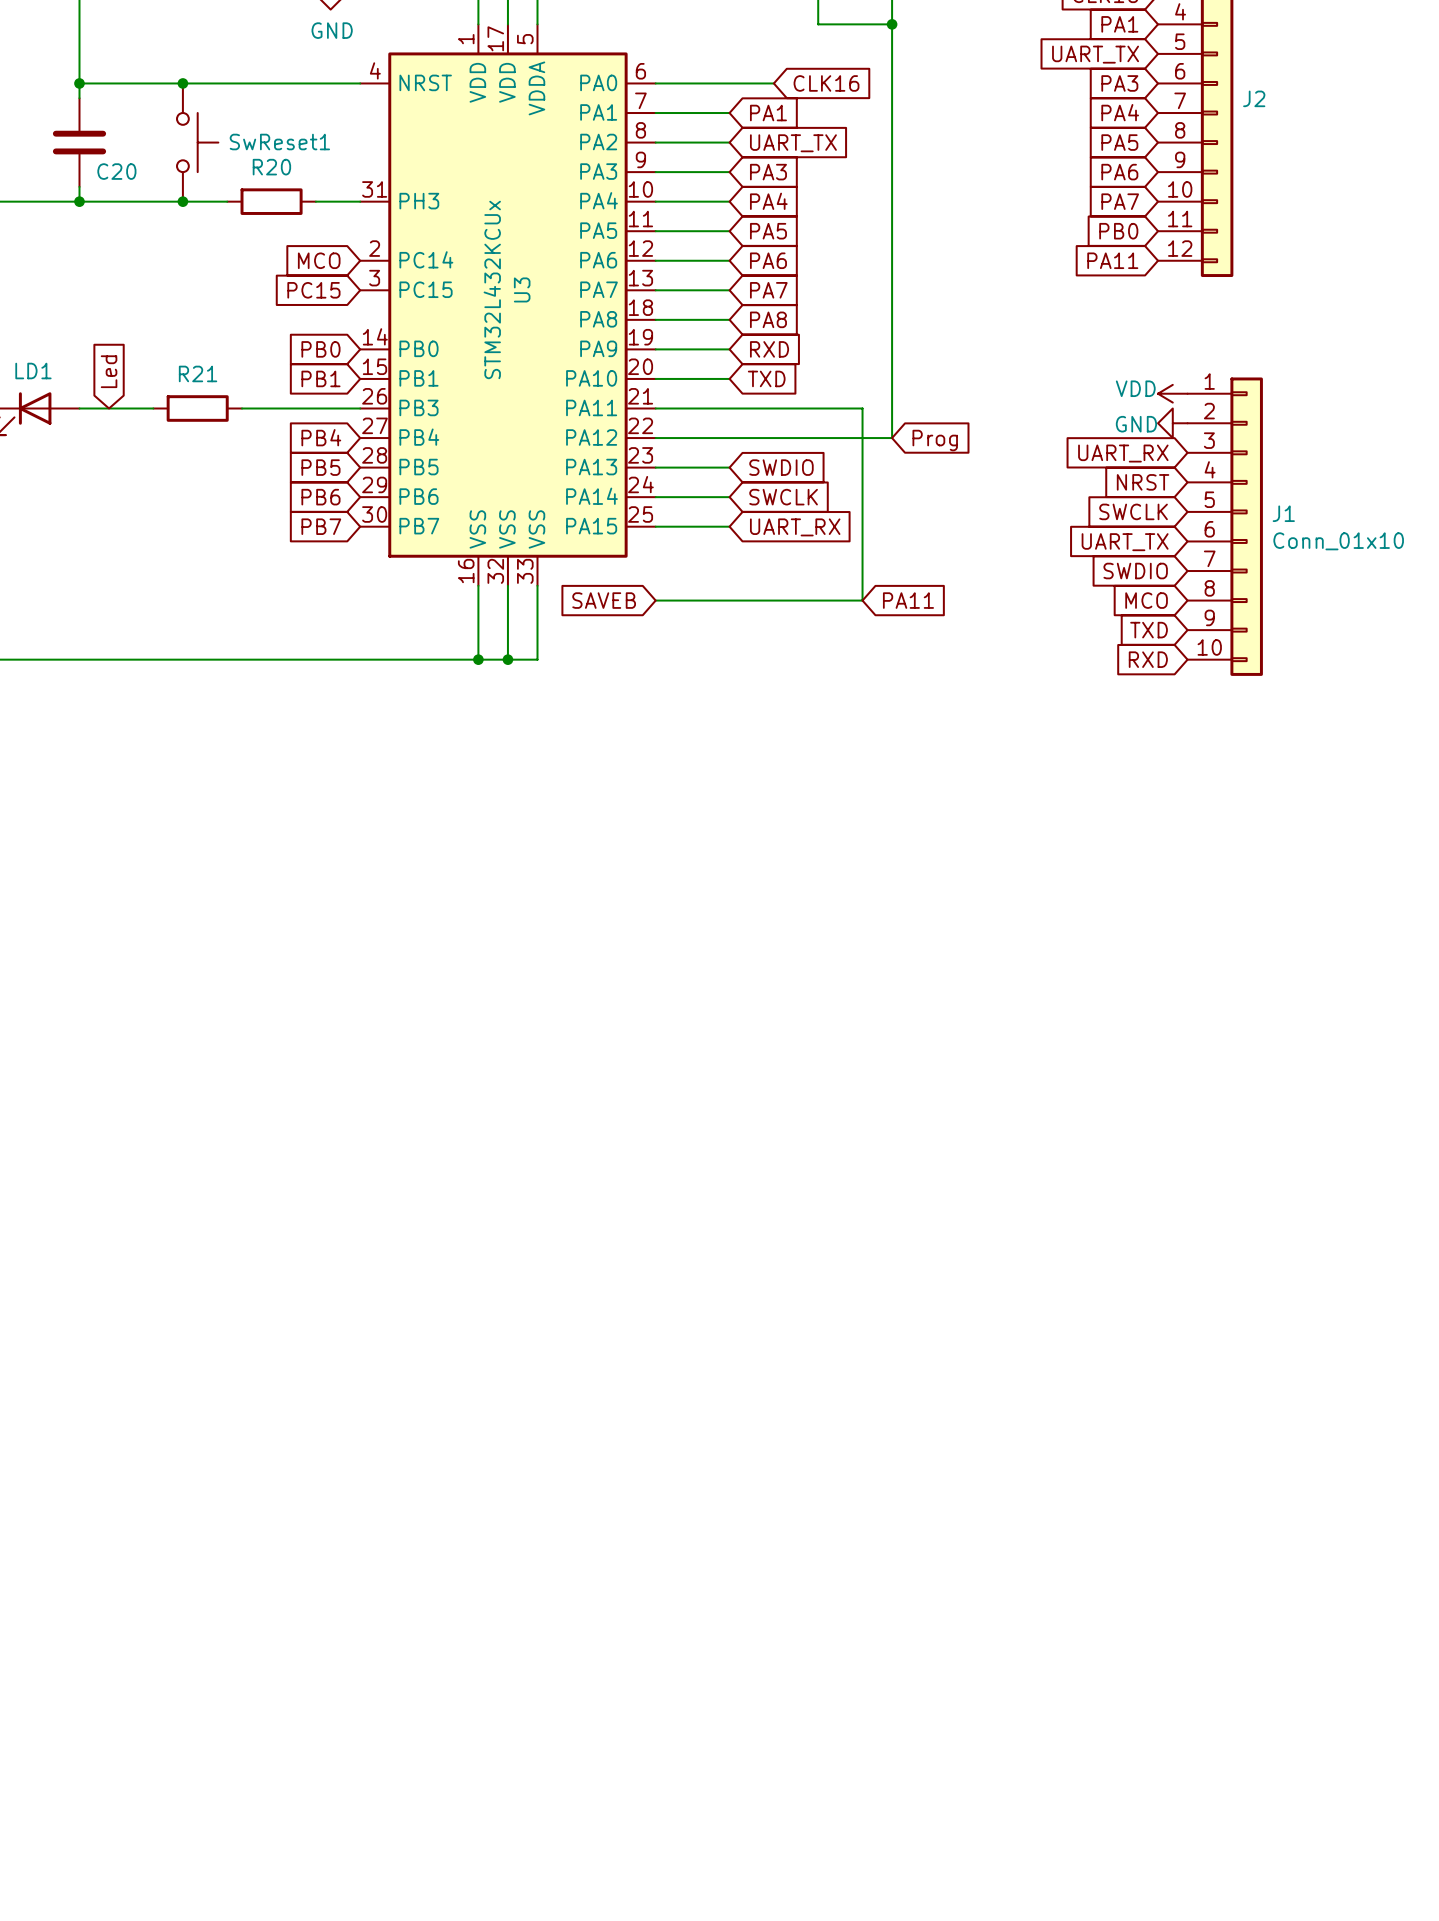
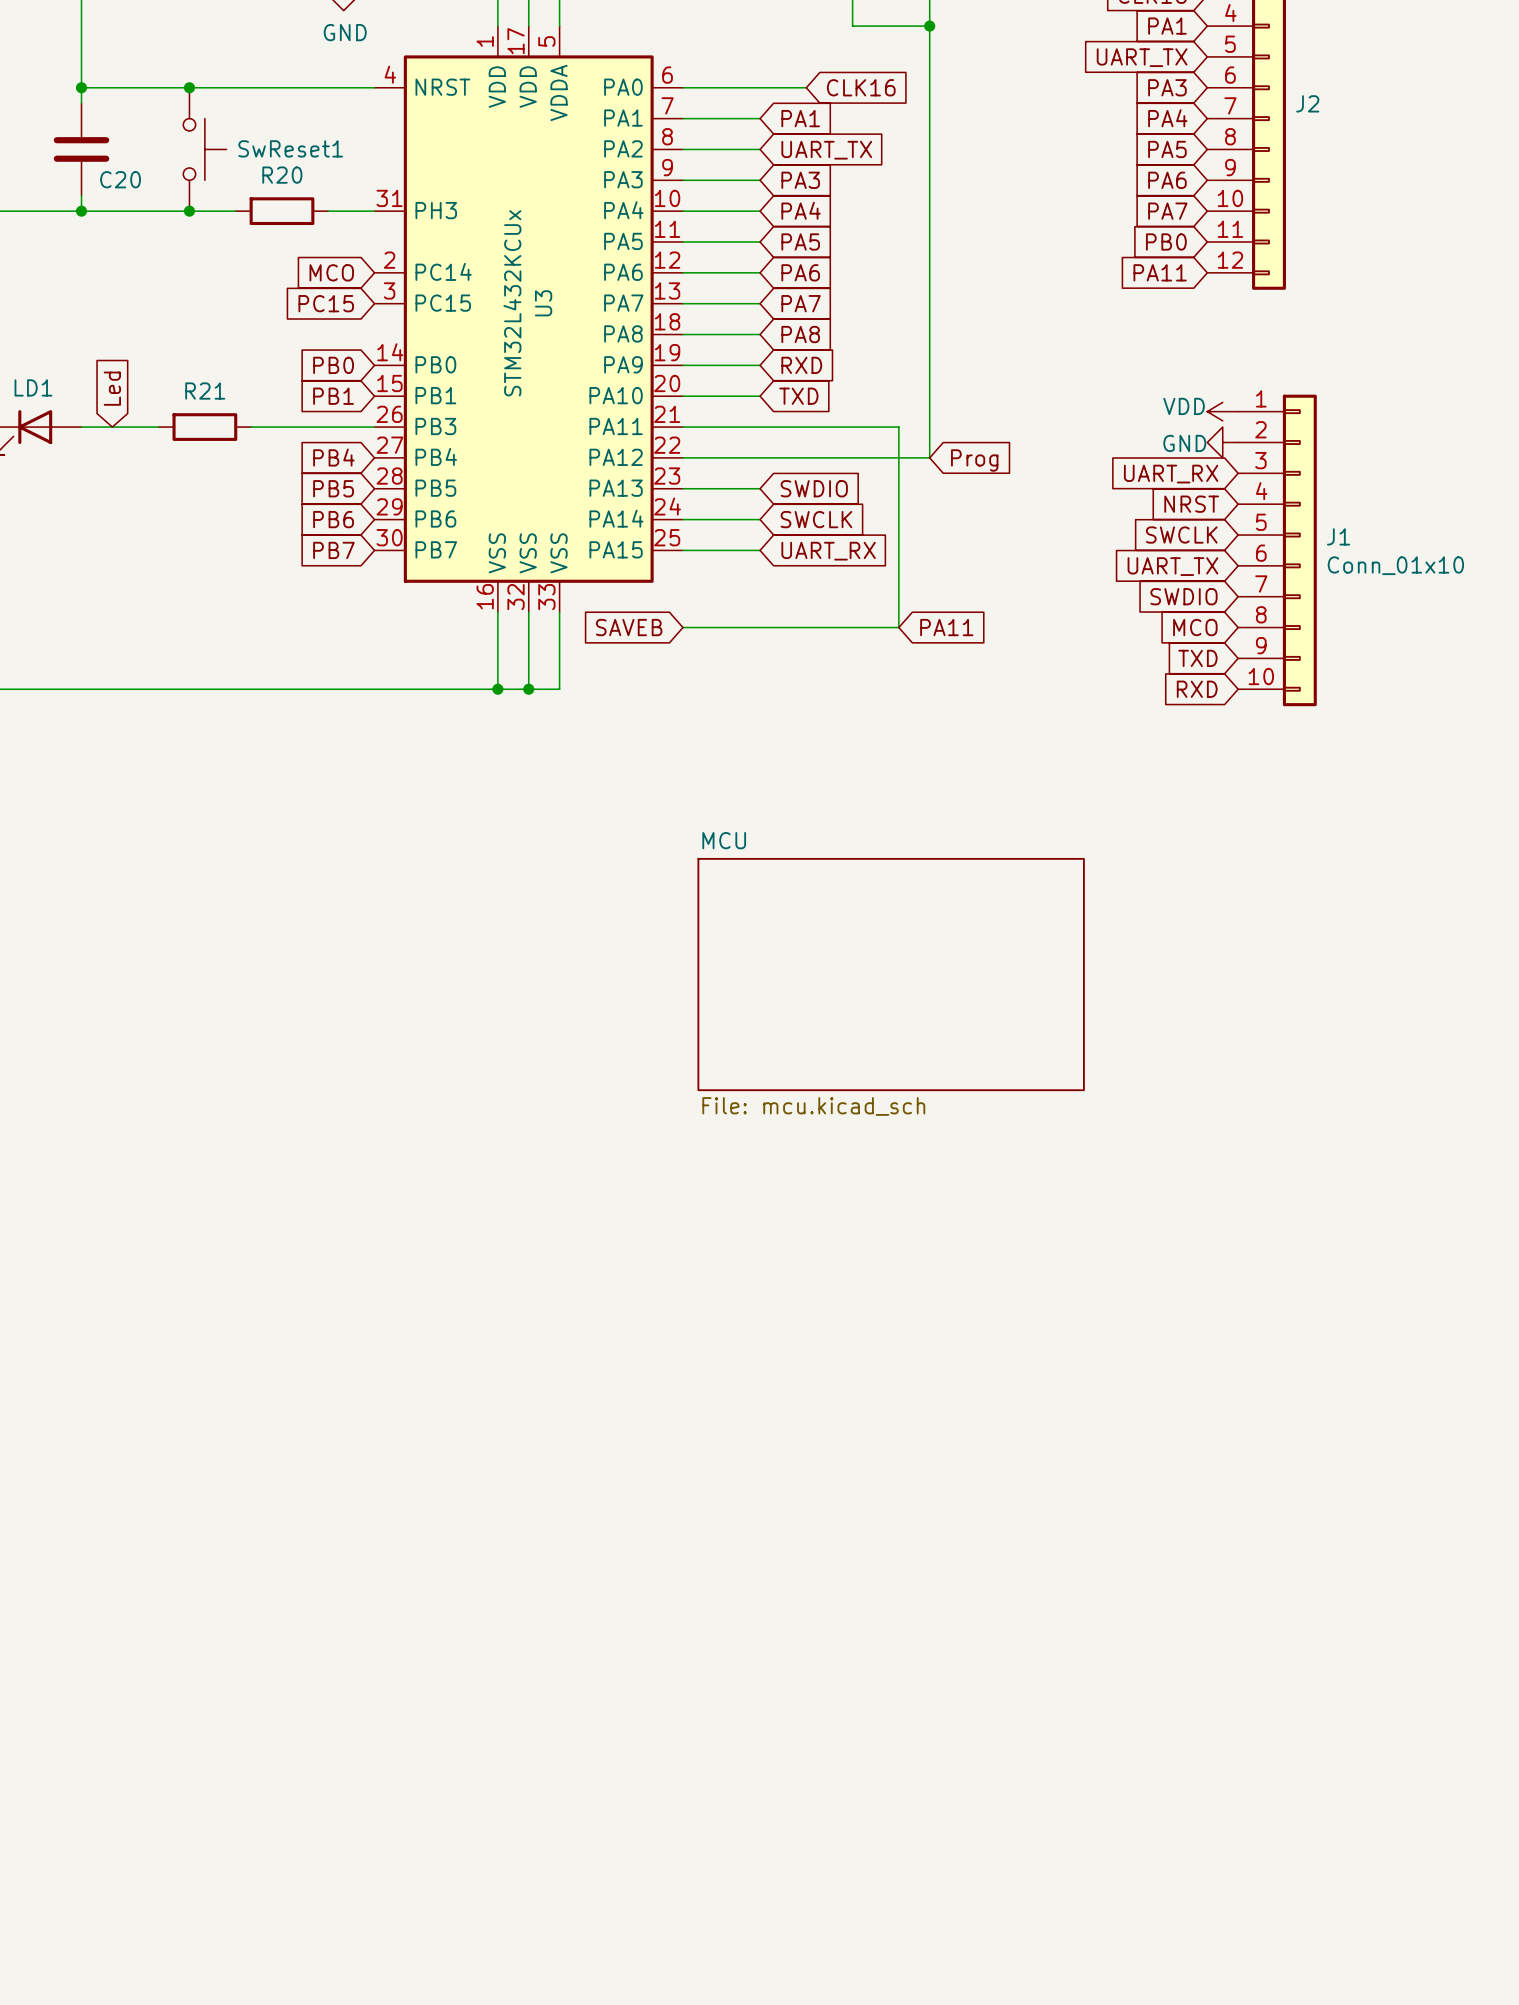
sheet MCU: none -> File: mcu.kicad_sch (891, 974)

